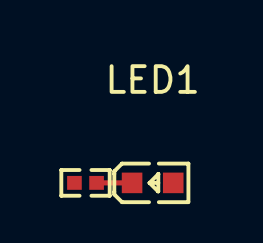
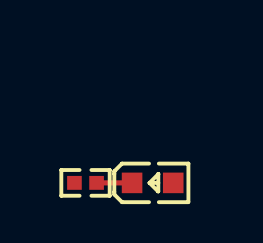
LED1 name: LED1 (153, 79) -> none

